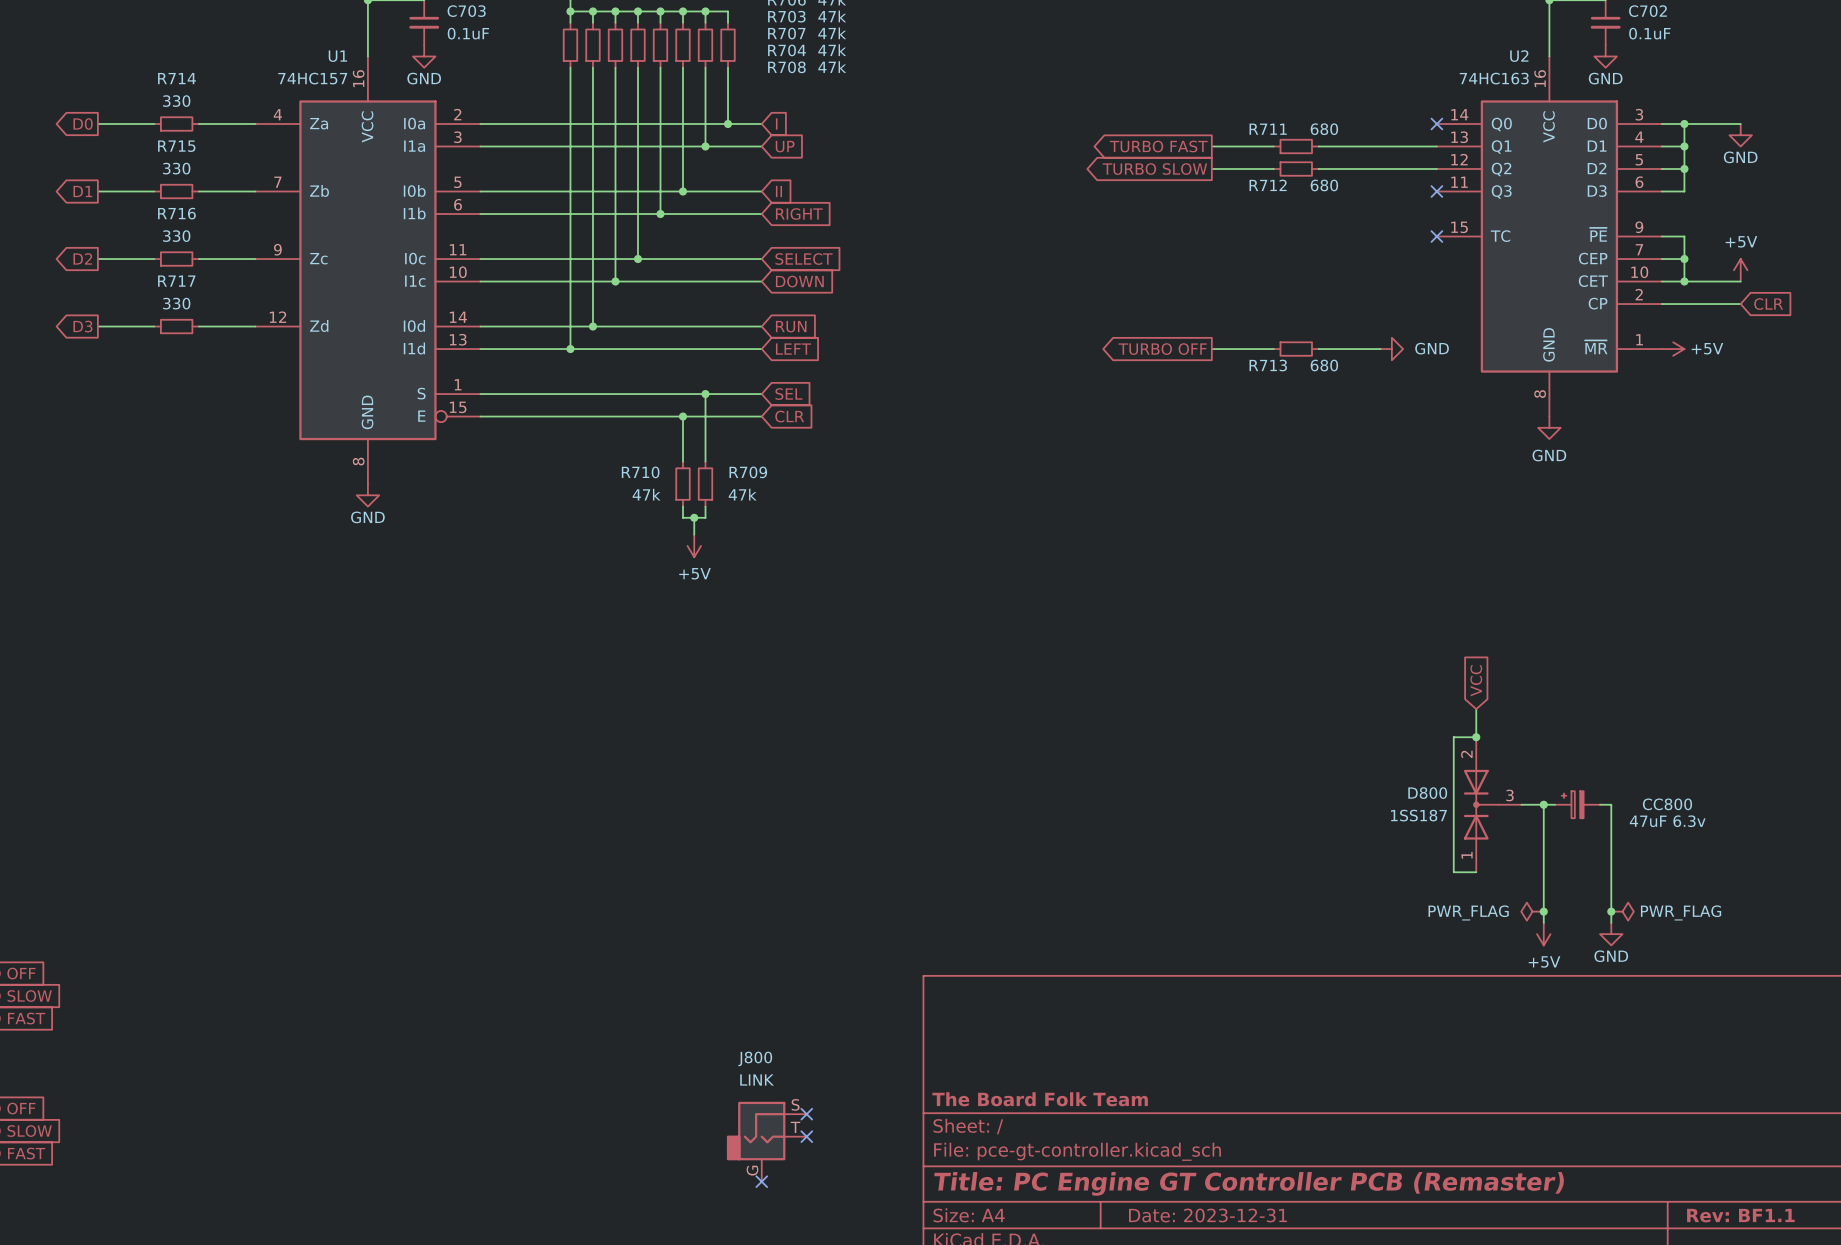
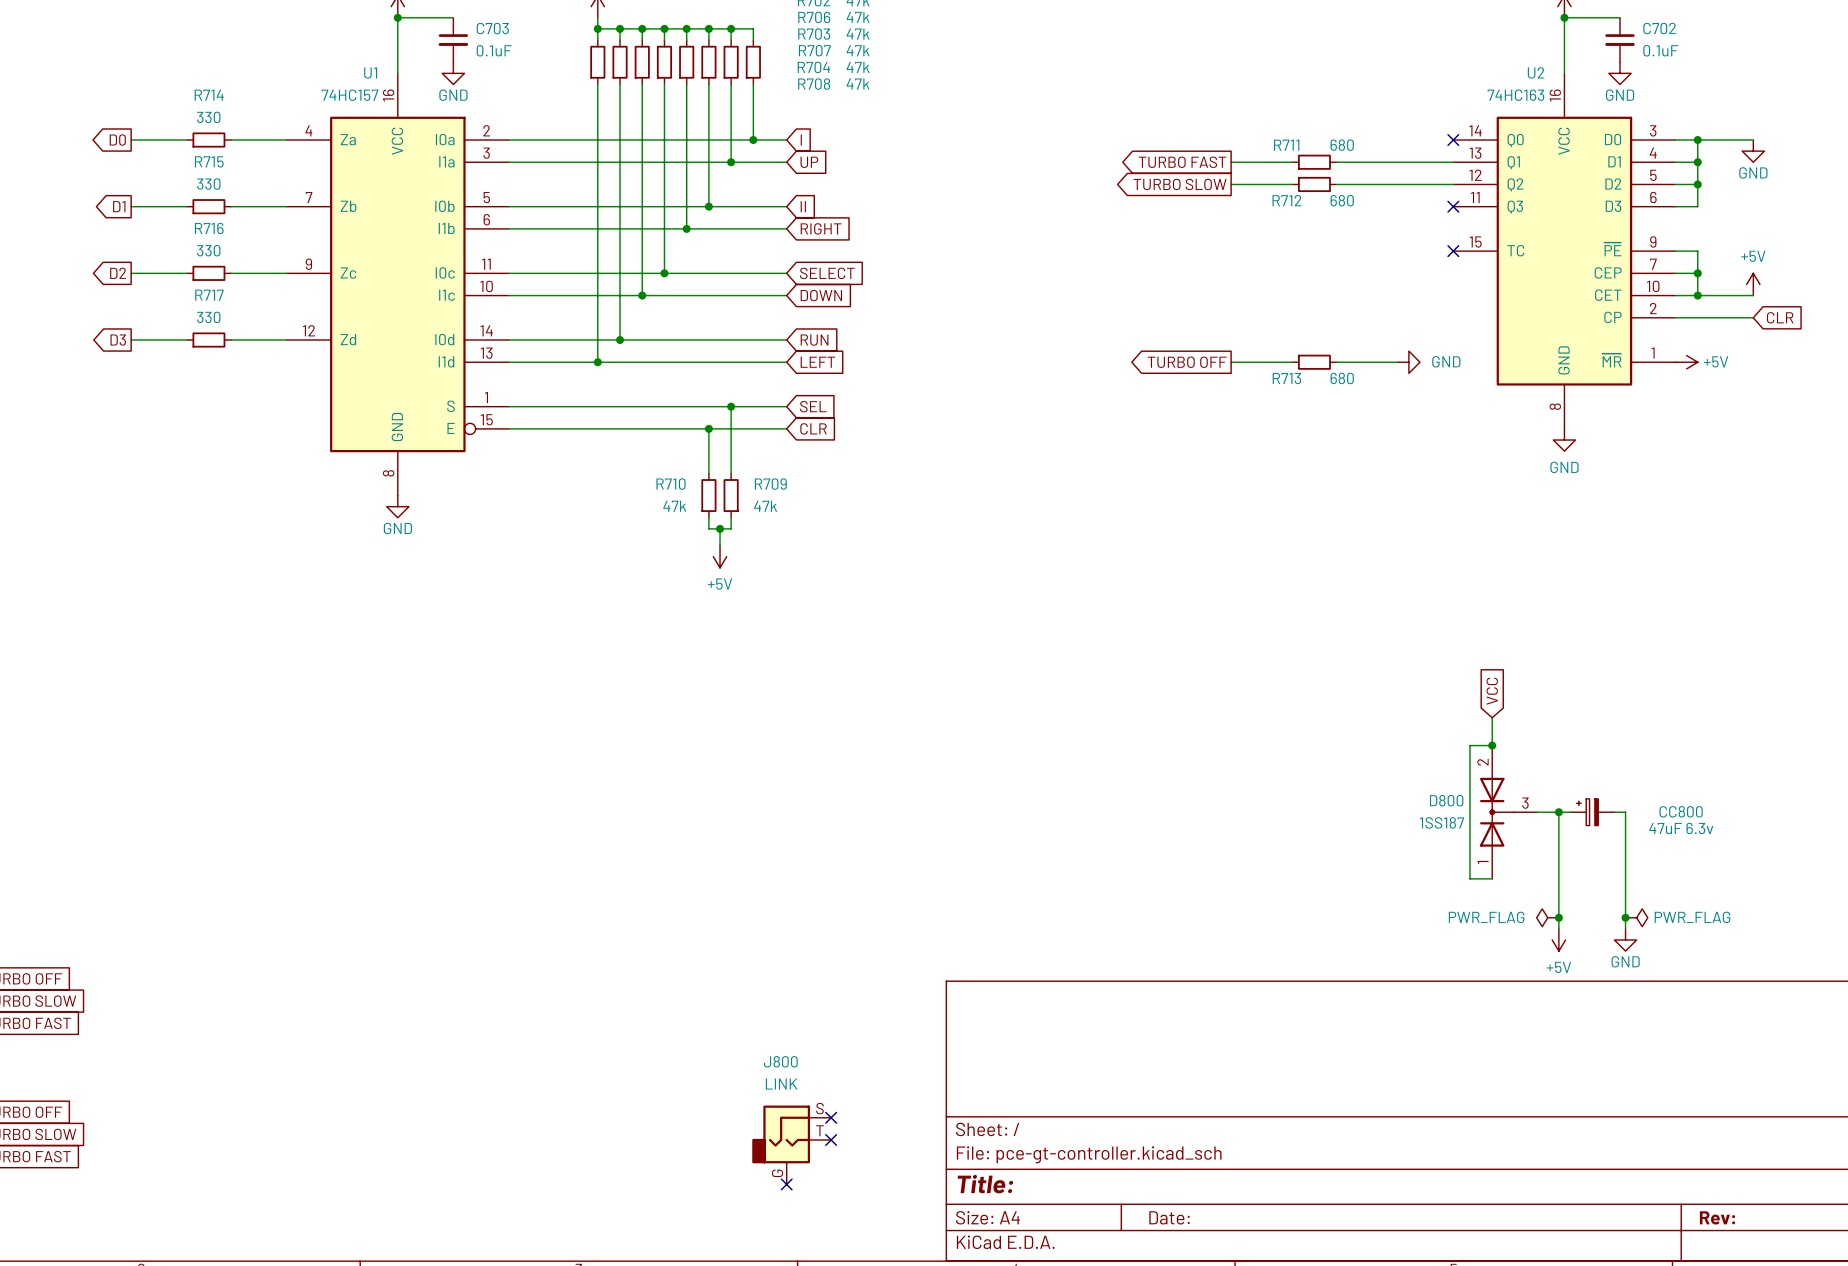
title block: The Board Folk Team (1040, 1099) -> none
title block: Title: PC Engine GT Controller PCB (Remaster) (1249, 1183) -> Title: (985, 1184)
title block: Date: 2023-12-31 (1208, 1215) -> Date: (1169, 1217)
title block: Rev: BF1.1 (1740, 1215) -> Rev: (1717, 1217)

